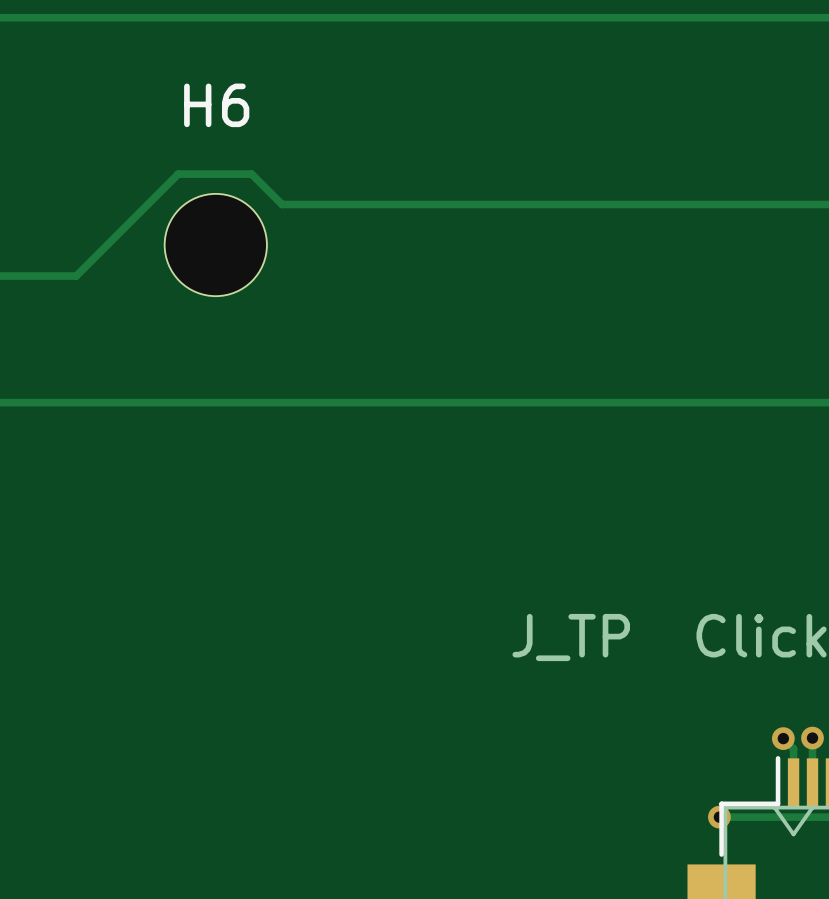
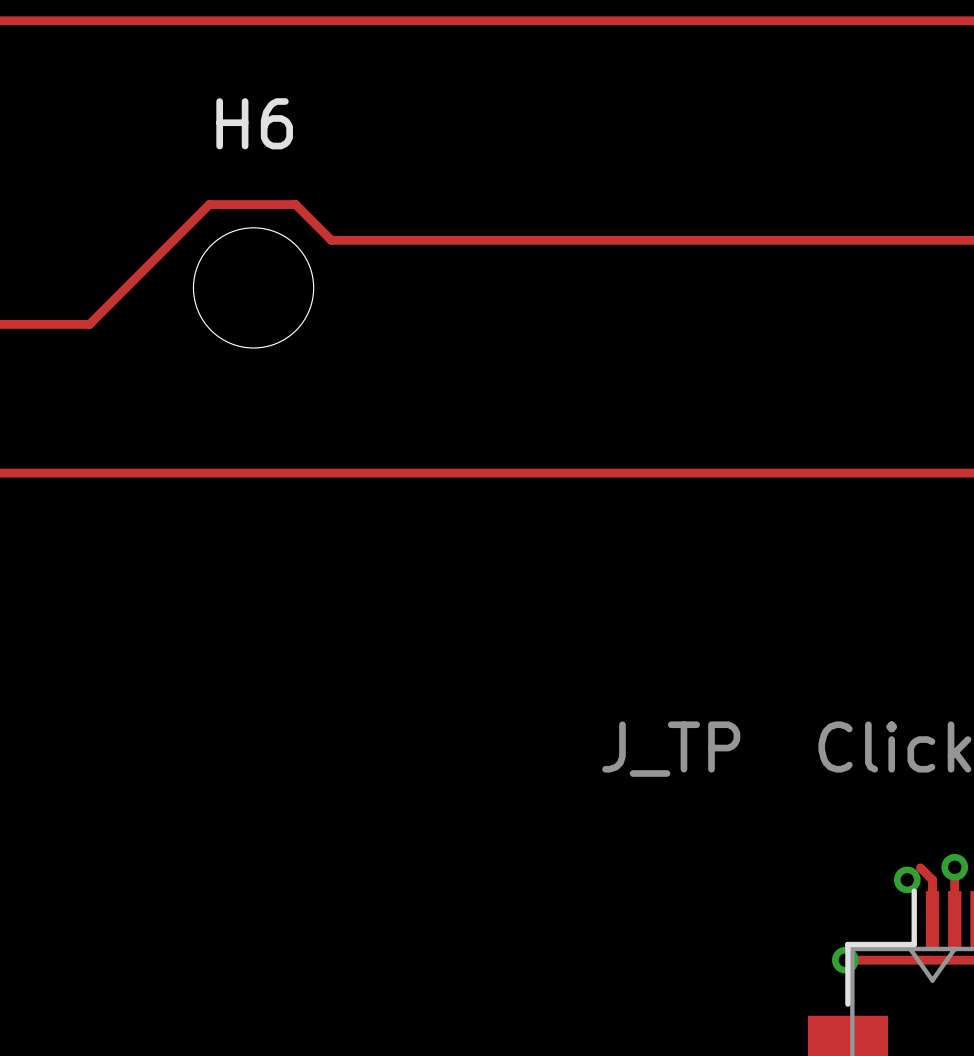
via position: (783, 738) -> (907, 879)

